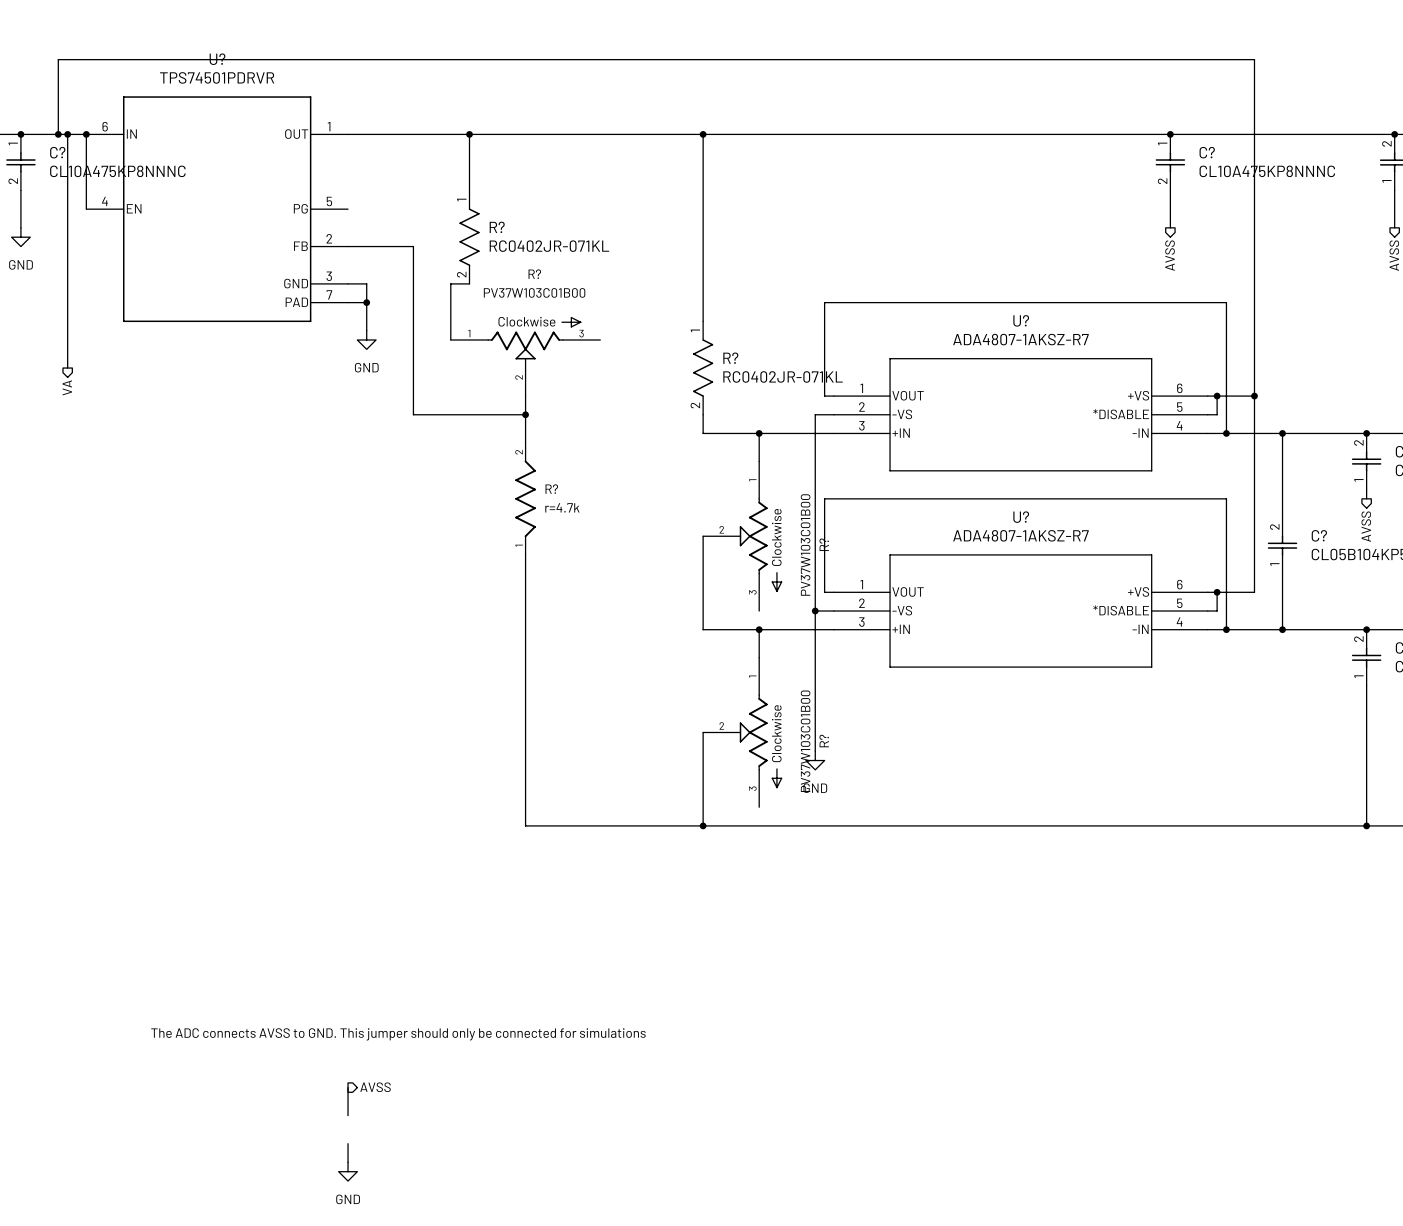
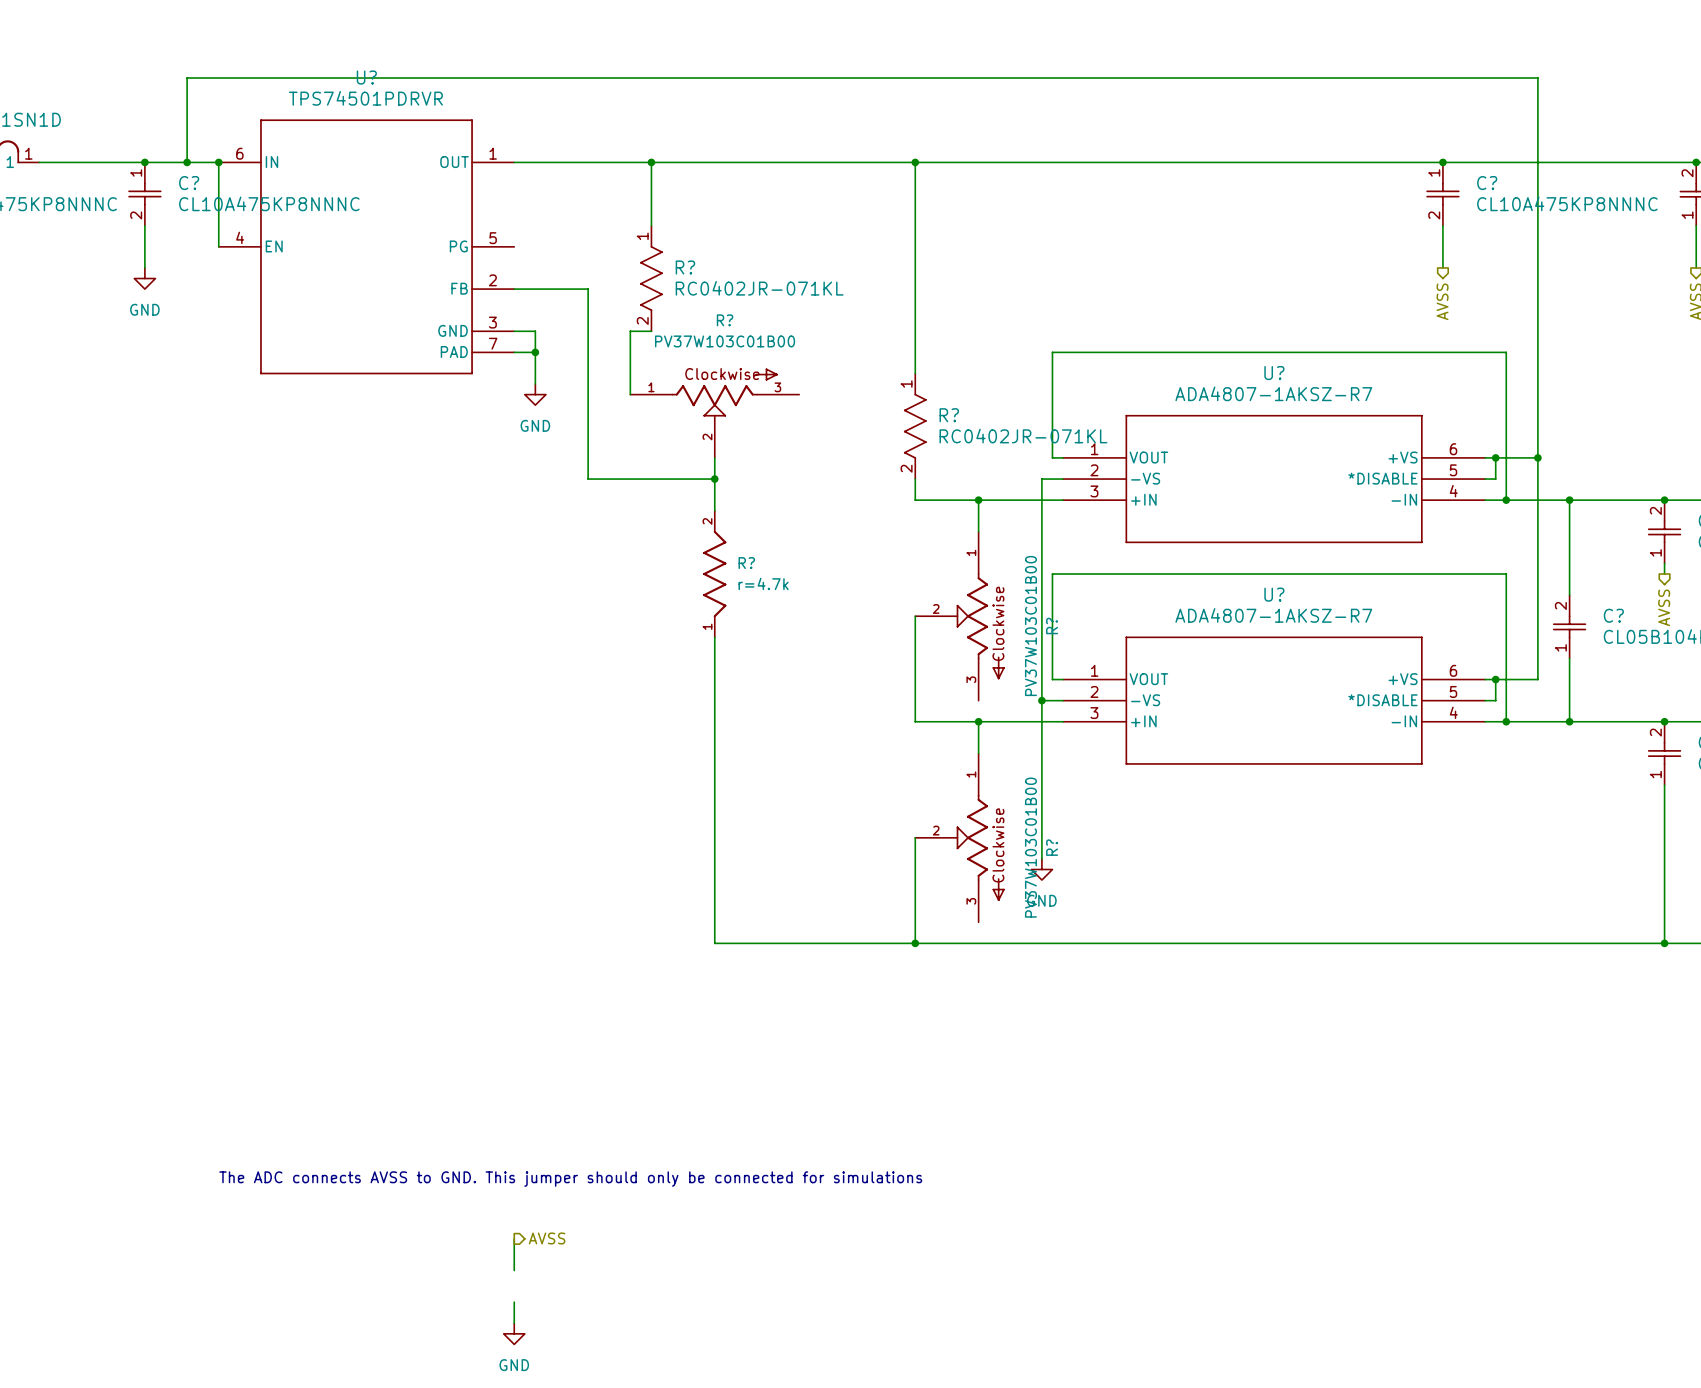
wire: (67, 134) (67, 368) -> none
junction: (67, 134) -> none
hierarchical label: VA (67, 387) -> none

